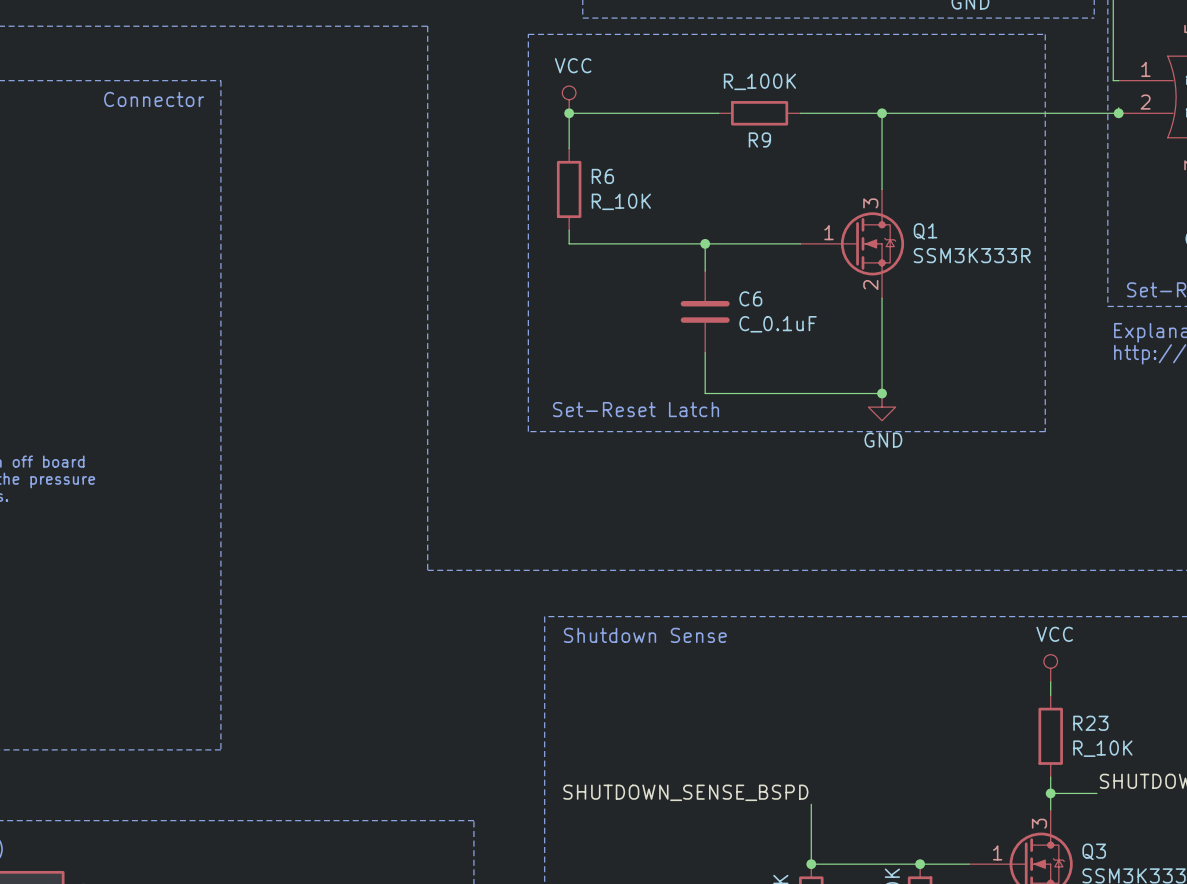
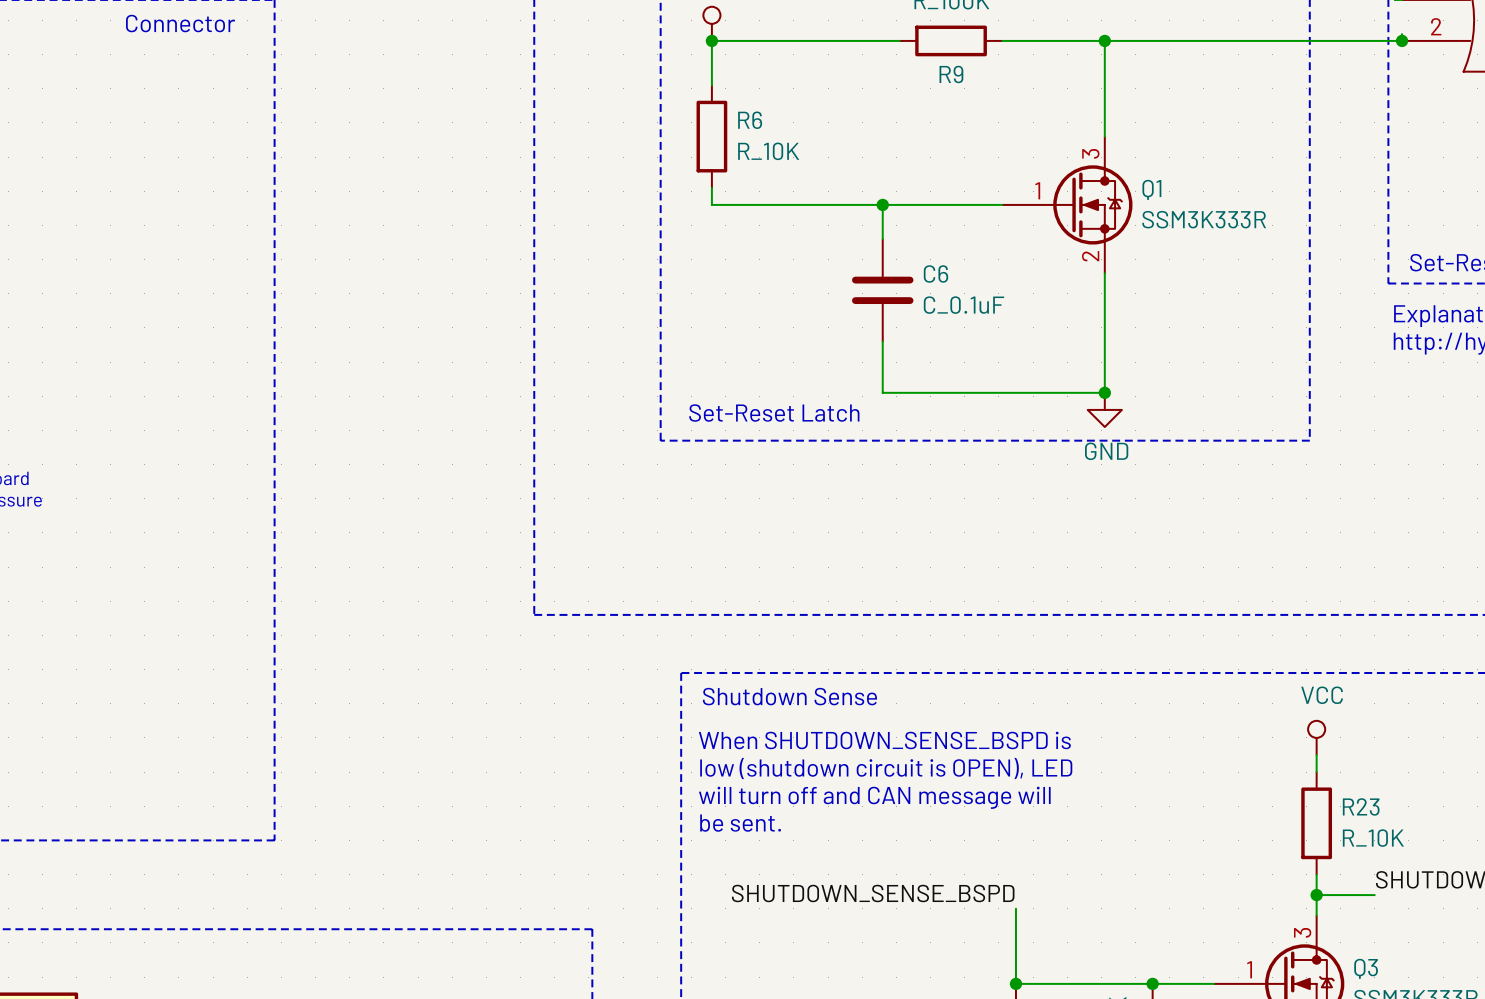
text: none -> When SHUTDOWN_SENSE_BSPD is (884, 740)
text: none -> low (shutdown circuit is OPEN), LED (886, 768)
text: none -> will turn off and CAN message will (874, 797)
text: none -> be sent. (740, 823)

